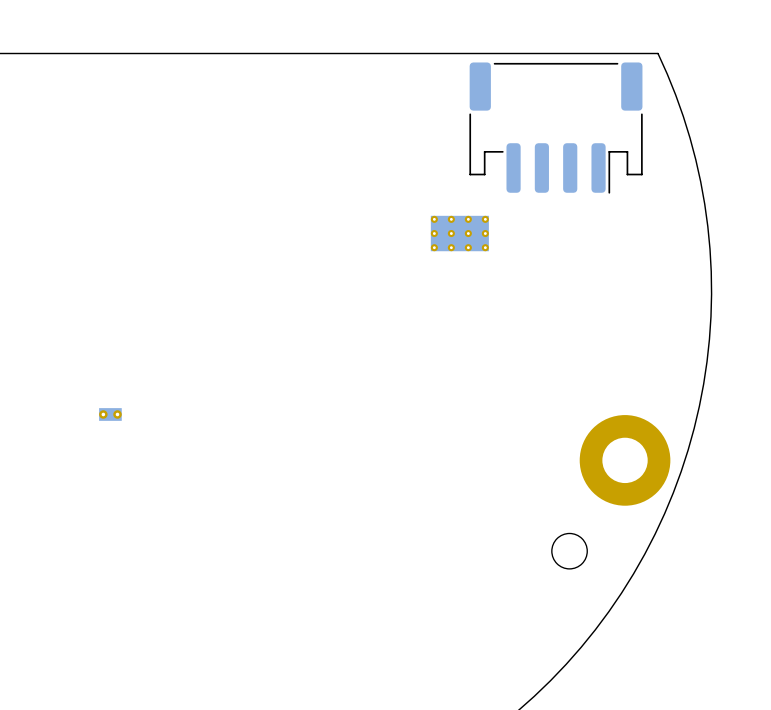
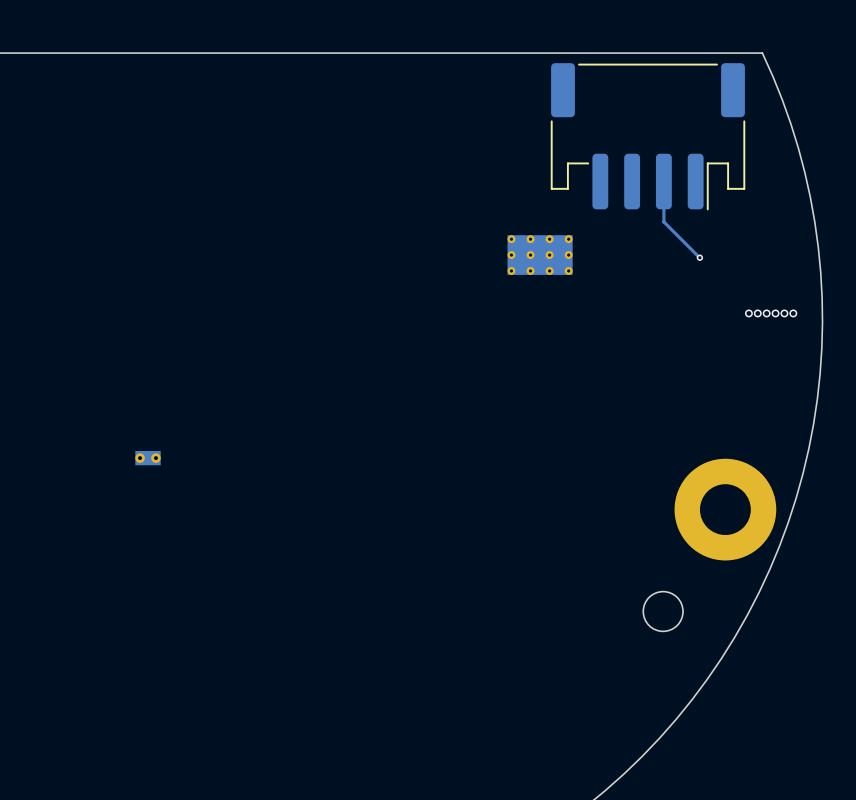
track: none -> (663, 181) (663, 221) (699, 257)
via: none -> (699, 257)
via: none -> (748, 313)
via: none -> (757, 313)
via: none -> (766, 313)
via: none -> (775, 313)
via: none -> (784, 313)
via: none -> (793, 313)

